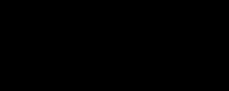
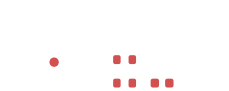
part: none -> (124, 59)
part: none -> (54, 62)
part: none -> (124, 83)
part: none -> (162, 83)

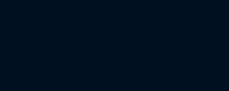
part: (124, 59) -> none
part: (54, 62) -> none
part: (124, 83) -> none
part: (162, 83) -> none

